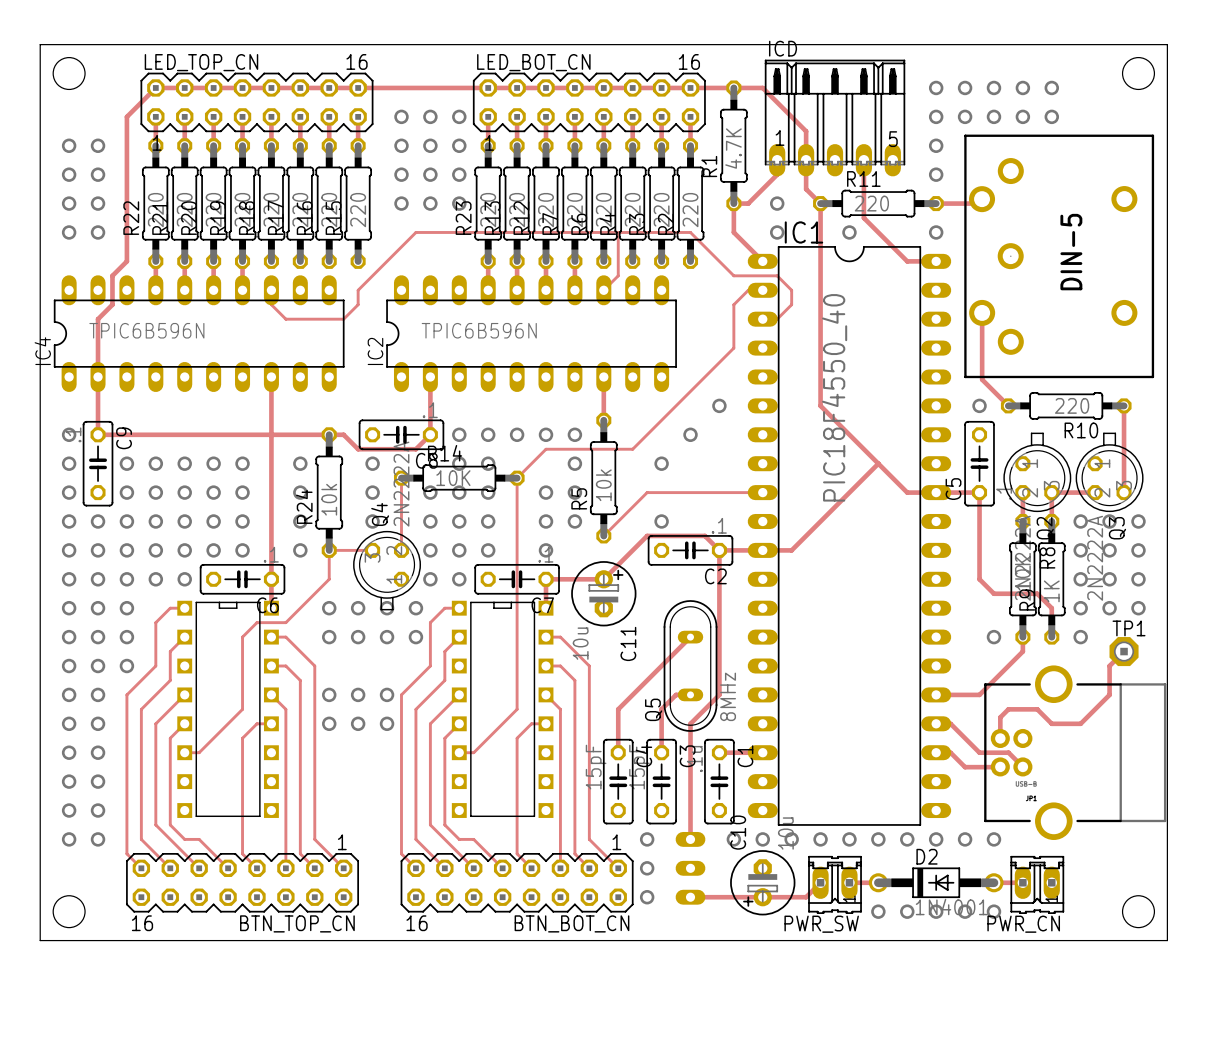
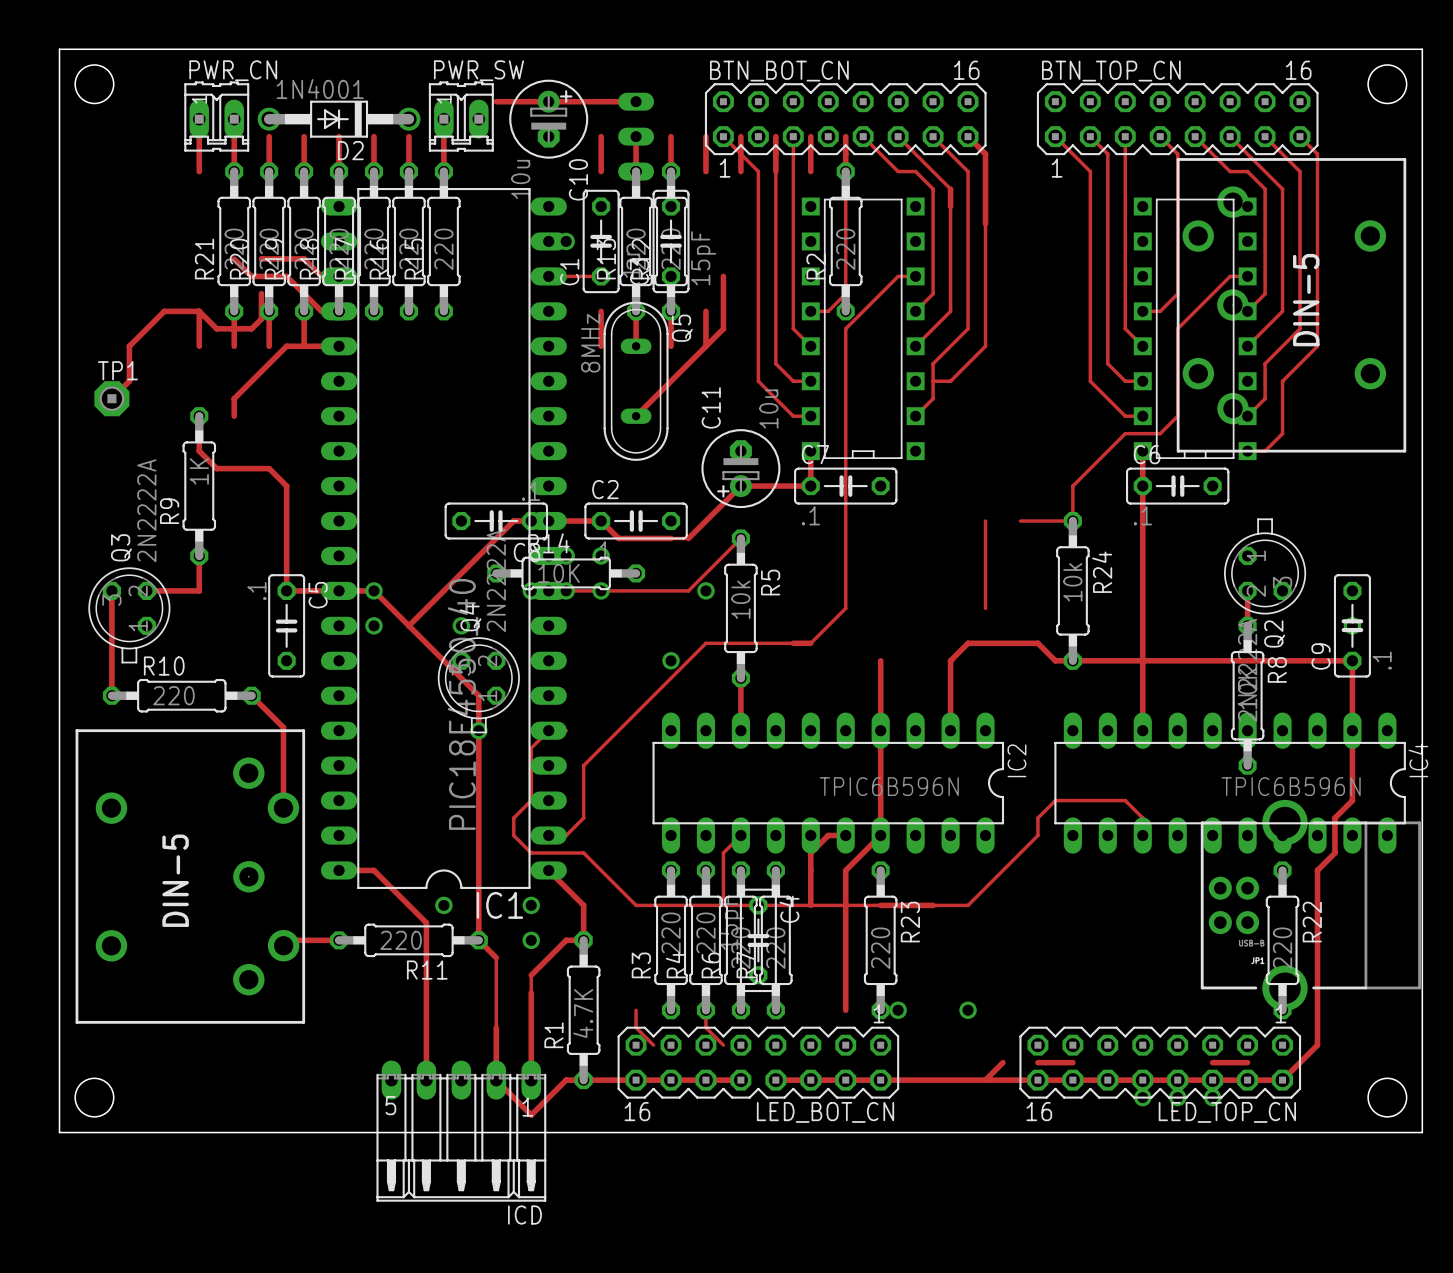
track: (401, 87) (155, 87) (126, 116) (126, 261) -> (261, 293) (261, 319) (251, 328) (216, 328) (199, 311) (164, 311)
track: (517, 87) (762, 87) (791, 116) -> none
via: (936, 87) -> none
via: (965, 87) -> none
via: (993, 87) -> none
via: (1022, 87) -> none
via: (1051, 87) -> none
PWR_CN: none -> (216, 116)
PWR_SW: none -> (461, 116)
LED_TOP_CN: (256, 102) -> none
LED_BOT_CN: (589, 102) -> none
BTN_BOT_CN: none -> (845, 119)
BTN_TOP_CN: none -> (1177, 119)
via: (401, 116) -> none
via: (430, 116) -> none
via: (459, 116) -> none
part: none -> (636, 136)
track: none -> (723, 136) (758, 171) (758, 276)
track: none -> (793, 136) (793, 328) (810, 346)
track: none -> (863, 136) (898, 171) (915, 171) (933, 189) (933, 293) (915, 311)
track: none -> (898, 136) (950, 189)
track: none -> (933, 136) (968, 171) (968, 328) (933, 363) (933, 398) (915, 416)
track: none -> (1055, 136) (1090, 171) (1090, 381) (1125, 416) (1142, 416)
track: none -> (1090, 136) (1107, 154) (1107, 363) (1125, 381) (1142, 381)
track: none -> (1125, 136) (1125, 328) (1142, 346)
via: (936, 116) -> none
via: (965, 116) -> none
track: none -> (1195, 136) (1230, 171) (1247, 171) (1265, 189) (1265, 293) (1247, 311)
via: (993, 116) -> none
track: none -> (1230, 136) (1282, 189) (1282, 311) (1247, 346)
via: (1022, 116) -> none
track: none -> (1265, 136) (1300, 171) (1300, 328) (1265, 363) (1265, 398) (1247, 416)
via: (1051, 116) -> none
track: none -> (1300, 136) (1317, 154) (1317, 346) (1282, 381) (1282, 433) (1265, 451) (1247, 451)
ICD: (835, 118) -> none
via: (69, 145) -> none
via: (98, 145) -> none
via: (401, 145) -> none
via: (430, 145) -> none
via: (459, 145) -> none
track: none -> (775, 171) (775, 363) (793, 381) (810, 381)
track: none -> (845, 171) (845, 293) (828, 311) (810, 311)
R1 position: (733, 145) -> (583, 1010)
via: (936, 145) -> none
track: (863, 160) (863, 218) (907, 261) (936, 261) -> (1160, 136) (1177, 154) (1177, 293) (1160, 311) (1142, 311)
via: (69, 174) -> none
via: (98, 174) -> none
via: (401, 174) -> none
via: (430, 174) -> none
via: (459, 174) -> none
track: (777, 174) (748, 203) (733, 203) (733, 232) (762, 261) -> (950, 206) (950, 311) (915, 346)
via: (936, 174) -> none
R11 name position: R11 (863, 179) -> R11 (427, 970)
track: (806, 189) (820, 203) (820, 405) (907, 492) (979, 492) (979, 579) (993, 593) (1037, 593) (1051, 608) (1051, 637) -> none
track: (982, 199) (977, 203) (936, 203) -> none
via: (69, 203) -> none
via: (98, 203) -> none
R22 position: (155, 203) -> (1282, 940)
via: (401, 203) -> none
via: (430, 203) -> none
R23 position: (488, 203) -> (880, 940)
R7 position: (574, 203) -> (775, 940)
R6 position: (603, 203) -> (740, 940)
R4 position: (632, 203) -> (705, 940)
R3 position: (661, 203) -> (671, 940)
via: (777, 203) -> none
R11 position: (878, 203) -> (408, 940)
R4 value position: 220 (632, 210) -> 220 (705, 933)
R3 value position: 220 (661, 210) -> 220 (671, 933)
R22 name position: R22 (131, 218) -> R22 (1312, 922)
track: none -> (234, 259) (251, 276) (286, 276) (321, 311) (339, 311)
track: none -> (261, 259) (304, 258) (321, 276) (339, 276)
R23 name position: R23 (463, 218) -> R23 (910, 922)
via: (69, 232) -> none
via: (98, 232) -> none
track: (444, 232) (415, 232) (358, 290) (358, 304) (343, 319) (285, 319) (271, 304) (271, 290) -> (234, 416) (234, 398) (286, 346) (339, 346)
track: (488, 232) (690, 232) (733, 275) (777, 275) (791, 290) (791, 304) -> (985, 223) (985, 346) (968, 363)
track: none -> (723, 276) (723, 328) (636, 416)
via: (777, 232) -> none
via: (849, 232) -> none
via: (936, 232) -> none
track: none -> (1247, 276) (1230, 276) (1177, 328) (1177, 416) (1160, 433) (1125, 433) (1072, 486) (1072, 521) (1020, 521)
track: (112, 275) (112, 304) (98, 319) (98, 434) (343, 434) (358, 449) (415, 449) (430, 434) (430, 376) -> (146, 328) (129, 346) (129, 381) (111, 398)
track: (618, 275) (603, 290) -> (758, 328) (758, 381) (793, 416) (810, 416)
part: none -> (863, 328)
part: none -> (1195, 328)
track: (762, 290) (748, 290) (733, 304) (733, 348) (632, 449) (560, 449) -> (810, 451) (810, 486) (740, 486) (688, 538)
track: (982, 312) (982, 379) (1008, 405) -> none
IC4 rotation: 0° (199, 333) -> 180° (1230, 783)
IC4 position: (199, 333) -> (1230, 783)
IC2 rotation: 0° (531, 333) -> 180° (828, 783)
IC2 position: (531, 333) -> (828, 783)
track: none -> (199, 416) (199, 451) (216, 468) (269, 468) (286, 486) (286, 590) (374, 590) (478, 695) (478, 940) (496, 957)
track: (271, 376) (271, 608) -> none
track: (603, 376) (603, 420) -> (740, 678) (740, 730)
track: none -> (1142, 451) (1142, 730)
via: (719, 405) -> none
via: (979, 405) -> none
R10 position: (1066, 405) -> (181, 695)
R10 value position: 220 (1072, 405) -> 220 (173, 695)
track: (1124, 405) (1124, 492) -> none
R10 name position: R10 (1081, 430) -> R10 (164, 666)
Q3 footprint: [1075, 432, 1144, 513] -> [88, 567, 171, 664]
via: (69, 434) -> none
via: (459, 434) -> none
via: (488, 434) -> none
via: (517, 434) -> none
via: (546, 434) -> none
via: (574, 434) -> none
via: (690, 434) -> none
track: none -> (985, 521) (985, 608)
track: (546, 449) (517, 478) (517, 709) (473, 752) (459, 752) -> (671, 538) (618, 538) (601, 521) (513, 521) (408, 625)
track: none -> (740, 538) (688, 590) (548, 590)
via: (69, 463) -> none
C9 rotation: 0° (98, 463) -> 180° (1352, 625)
C9 position: (98, 463) -> (1352, 625)
via: (126, 463) -> none
track: none -> (199, 555) (199, 590) (146, 590)
via: (155, 463) -> none
via: (184, 463) -> none
via: (213, 463) -> none
via: (242, 463) -> none
via: (300, 463) -> none
via: (372, 463) -> none
via: (574, 463) -> none
via: (661, 463) -> none
track: (878, 463) (791, 550) (719, 550) (704, 535) (661, 535) -> (915, 276) (898, 276) (845, 328) (845, 608) (810, 643)
C5 rotation: 0° (979, 463) -> 180° (286, 625)
C5 position: (979, 463) -> (286, 625)
track: (401, 478) (401, 550) -> none
R5 position: (603, 478) -> (740, 608)
R5 value position: 10k (603, 485) -> 10k (740, 599)
via: (69, 492) -> none
track: none -> (111, 590) (111, 695)
via: (126, 492) -> none
via: (155, 492) -> none
via: (184, 492) -> none
via: (213, 492) -> none
via: (242, 492) -> none
R24 position: (329, 492) -> (1072, 590)
via: (372, 492) -> none
via: (546, 492) -> none
track: (762, 492) (647, 492) (603, 535) -> none
track: (1095, 492) (1051, 492) (1051, 521) -> none
R5 name position: R5 (579, 498) -> R5 (770, 582)
R24 value position: 10k (329, 499) -> 10k (1072, 582)
R24 name position: R24 (304, 506) -> R24 (1102, 572)
via: (69, 521) -> none
via: (98, 521) -> none
via: (126, 521) -> none
via: (155, 521) -> none
via: (184, 521) -> none
via: (213, 521) -> none
via: (242, 521) -> none
via: (430, 521) -> none
via: (459, 521) -> none
via: (488, 521) -> none
via: (546, 521) -> none
via: (574, 521) -> none
via: (661, 521) -> none
via: (1080, 521) -> none
via: (1138, 521) -> none
Q3 name position: Q3 (1117, 528) -> Q3 (121, 547)
track: (647, 535) (603, 579) (546, 579) (546, 608) -> (793, 643) (705, 643) (583, 765) (583, 818) (566, 835) (548, 835)
IC1 rotation: 0° (849, 535) -> 180° (443, 538)
IC1 position: (849, 535) -> (443, 538)
via: (69, 550) -> none
via: (98, 550) -> none
via: (126, 550) -> none
via: (155, 550) -> none
via: (184, 550) -> none
via: (213, 550) -> none
via: (242, 550) -> none
via: (300, 550) -> none
track: (372, 550) (329, 550) (329, 579) (285, 622) (256, 622) (242, 637) (242, 709) (199, 752) (184, 752) -> none
via: (430, 550) -> none
via: (459, 550) -> none
via: (488, 550) -> none
C2 rotation: 0° (690, 550) -> 180° (636, 521)
C2 position: (690, 550) -> (636, 521)
via: (1080, 550) -> none
via: (1109, 550) -> none
via: (1138, 550) -> none
Q3 value position: 2N2222A (1095, 558) -> 2N2222A (146, 510)
via: (69, 579) -> none
via: (98, 579) -> none
via: (126, 579) -> none
via: (155, 579) -> none
via: (184, 579) -> none
track: none -> (251, 695) (283, 727) (283, 808)
C6 rotation: 0° (242, 579) -> 180° (1177, 486)
C6 position: (242, 579) -> (1177, 486)
via: (430, 579) -> none
via: (459, 579) -> none
C7 rotation: 0° (517, 579) -> 180° (845, 486)
C7 position: (517, 579) -> (845, 486)
R9 position: (1051, 579) -> (199, 486)
via: (1080, 579) -> none
via: (1109, 579) -> none
via: (1138, 579) -> none
R9 value position: 1K (1051, 591) -> 1K (199, 471)
C11 rotation: 0° (603, 593) -> 180° (740, 468)
C11 position: (603, 593) -> (740, 468)
via: (69, 608) -> none
via: (98, 608) -> none
via: (126, 608) -> none
track: (184, 608) (170, 608) (155, 622) (155, 666) (126, 694) (126, 853) (141, 868) -> none
via: (329, 608) -> none
via: (358, 608) -> none
via: (415, 608) -> none
via: (1080, 608) -> none
via: (1109, 608) -> none
via: (1138, 608) -> none
via: (69, 637) -> none
via: (98, 637) -> none
via: (126, 637) -> none
track: (184, 637) (170, 651) (170, 680) (141, 709) (141, 839) (170, 868) -> none
track: (271, 637) (285, 637) (314, 666) (314, 839) (343, 868) -> none
via: (329, 637) -> none
via: (358, 637) -> none
via: (387, 637) -> none
via: (415, 637) -> none
track: (459, 637) (444, 651) (444, 680) (415, 709) (415, 839) (444, 868) -> none
track: (546, 637) (560, 637) (589, 666) (589, 709) -> (740, 835) (723, 852)
track: (690, 637) (618, 709) (618, 752) -> none
via: (993, 637) -> none
track: (1022, 637) (1022, 651) (979, 694) (936, 694) -> (933, 905) (968, 905) (1037, 835) (1037, 818) (1055, 800) (1125, 800) (1142, 818) (1142, 835)
via: (1080, 637) -> none
track: (1124, 651) (1109, 666) (1109, 694) (1095, 709) -> (950, 730) (950, 660) (968, 643) (1037, 643) (1055, 660) (1352, 660) (1352, 800) (1334, 818) (1334, 852)
TP1 position: (1124, 651) -> (111, 398)
via: (69, 666) -> none
via: (98, 666) -> none
via: (126, 666) -> none
track: (271, 666) (285, 666) (300, 680) (300, 853) (314, 868) -> none
track: (546, 666) (560, 666) (574, 680) (574, 839) -> none
Q5 position: (690, 666) -> (636, 381)
track: (415, 680) (401, 694) (401, 796) -> (513, 818) (513, 835) (531, 852) (583, 852) (636, 905) (880, 905)
via: (69, 694) -> none
via: (98, 694) -> none
track: (184, 694) (155, 723) (155, 824) (199, 868) -> none
track: (271, 694) (285, 709) (285, 868) -> none
via: (329, 694) -> none
via: (358, 694) -> none
via: (387, 694) -> none
track: (459, 694) (430, 723) (430, 810) -> (548, 870) (583, 905) (583, 940) (566, 940) (531, 975)
track: (546, 694) (560, 709) (560, 868) -> none
Q5 value position: 8MHz (728, 696) -> 8MHz (590, 343)
part: (228, 709) -> none
part: (502, 709) -> none
Q5 name position: Q5 (653, 709) -> Q5 (682, 328)
via: (69, 723) -> none
via: (98, 723) -> none
track: (184, 723) (170, 738) (170, 824) (184, 839) (199, 839) (228, 868) -> none
track: (271, 723) (256, 723) (242, 738) (242, 853) (256, 868) -> (339, 870) (374, 870) (426, 922) (426, 1080)
via: (329, 723) -> none
via: (358, 723) -> none
via: (387, 723) -> none
track: (459, 723) (444, 738) (444, 824) (459, 839) (473, 839) (502, 868) -> none
track: (546, 723) (531, 723) (517, 738) (517, 839) -> none
track: (936, 723) (950, 723) (979, 752) (1008, 752) (1022, 766) -> none
track: (1080, 723) (1051, 723) (1037, 709) (1008, 709) (1000, 717) (1000, 738) -> (1317, 870) (1317, 1045) (1282, 1080) (985, 1080)
part: none -> (190, 876)
via: (69, 752) -> none
via: (98, 752) -> none
via: none -> (443, 905)
via: none -> (531, 905)
track: (589, 752) (589, 839) (618, 868) -> none
track: (936, 752) (950, 752) (965, 767) (1000, 766) -> none
via: (69, 781) -> none
via: (98, 781) -> none
track: none -> (339, 940) (288, 940) (283, 945)
via: none -> (531, 940)
C3 rotation: 0° (661, 781) -> 180° (671, 241)
C3 position: (661, 781) -> (671, 241)
C1 rotation: 0° (719, 781) -> 180° (601, 241)
C1 position: (719, 781) -> (601, 241)
via: (69, 810) -> none
via: (98, 810) -> none
track: (430, 824) (473, 868) -> (531, 992) (531, 1080)
via: (69, 839) -> none
via: (98, 839) -> none
via: (647, 839) -> none
via: (762, 839) -> none
via: (820, 839) -> none
via: (849, 839) -> none
via: (878, 839) -> none
via: (907, 839) -> none
via: (936, 839) -> none
via: (965, 839) -> none
via: (993, 839) -> none
track: (401, 853) (415, 868) -> (496, 1027) (496, 1080) (531, 1115) (566, 1080) (740, 1080)
via: (647, 868) -> none
part: (690, 868) -> none
BTN_TOP_CN: (242, 882) -> none
BTN_BOT_CN: (517, 882) -> none
LED_BOT_CN: none -> (758, 1062)
C10 rotation: 0° (762, 882) -> 180° (548, 119)
C10 position: (762, 882) -> (548, 119)
D2 rotation: 0° (936, 882) -> 180° (339, 119)
D2 position: (936, 882) -> (339, 119)
LED_TOP_CN: none -> (1160, 1062)
PWR_SW: (835, 884) -> none
PWR_CN: (1037, 884) -> none
track: none -> (775, 1080) (845, 1080)
via: (647, 897) -> none
via: (878, 911) -> none
via: (907, 911) -> none
ICD: none -> (461, 1131)

